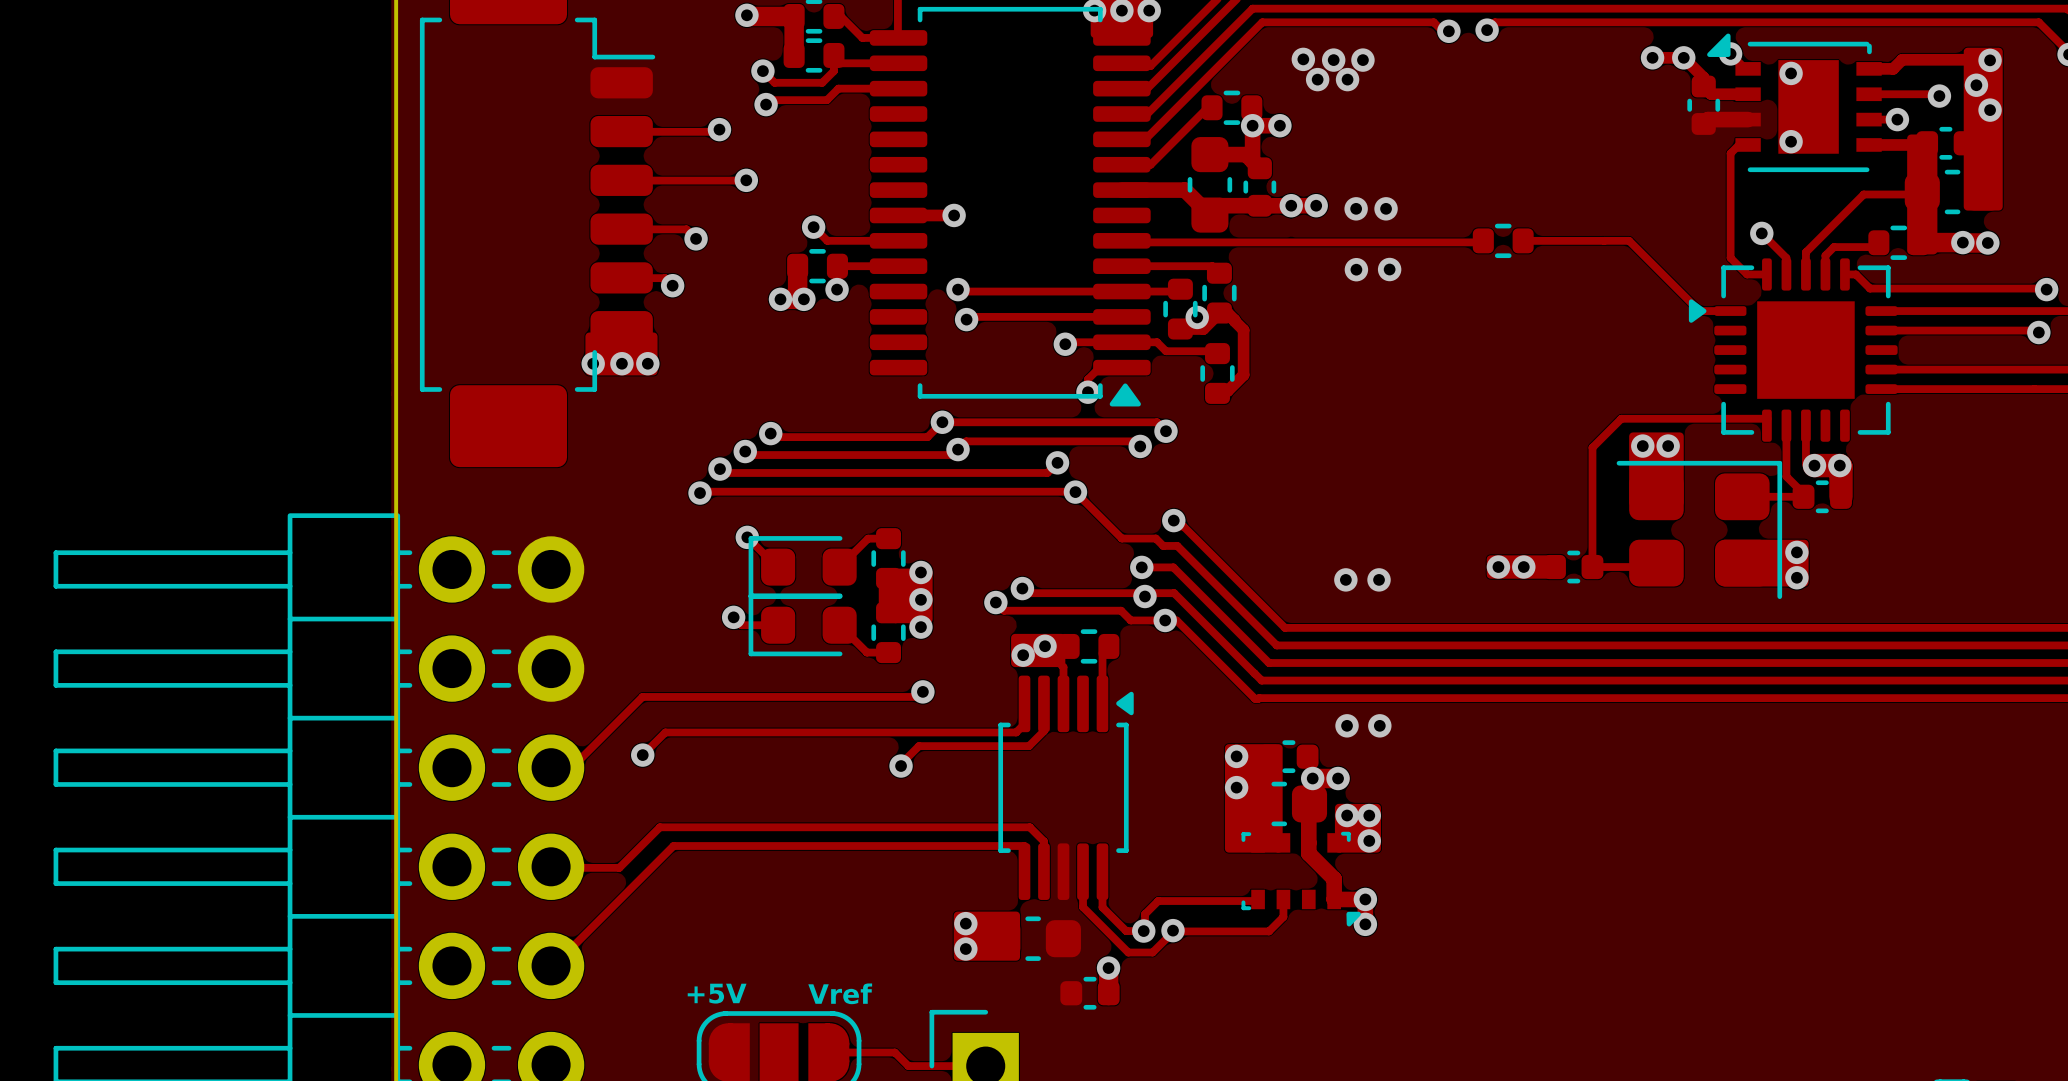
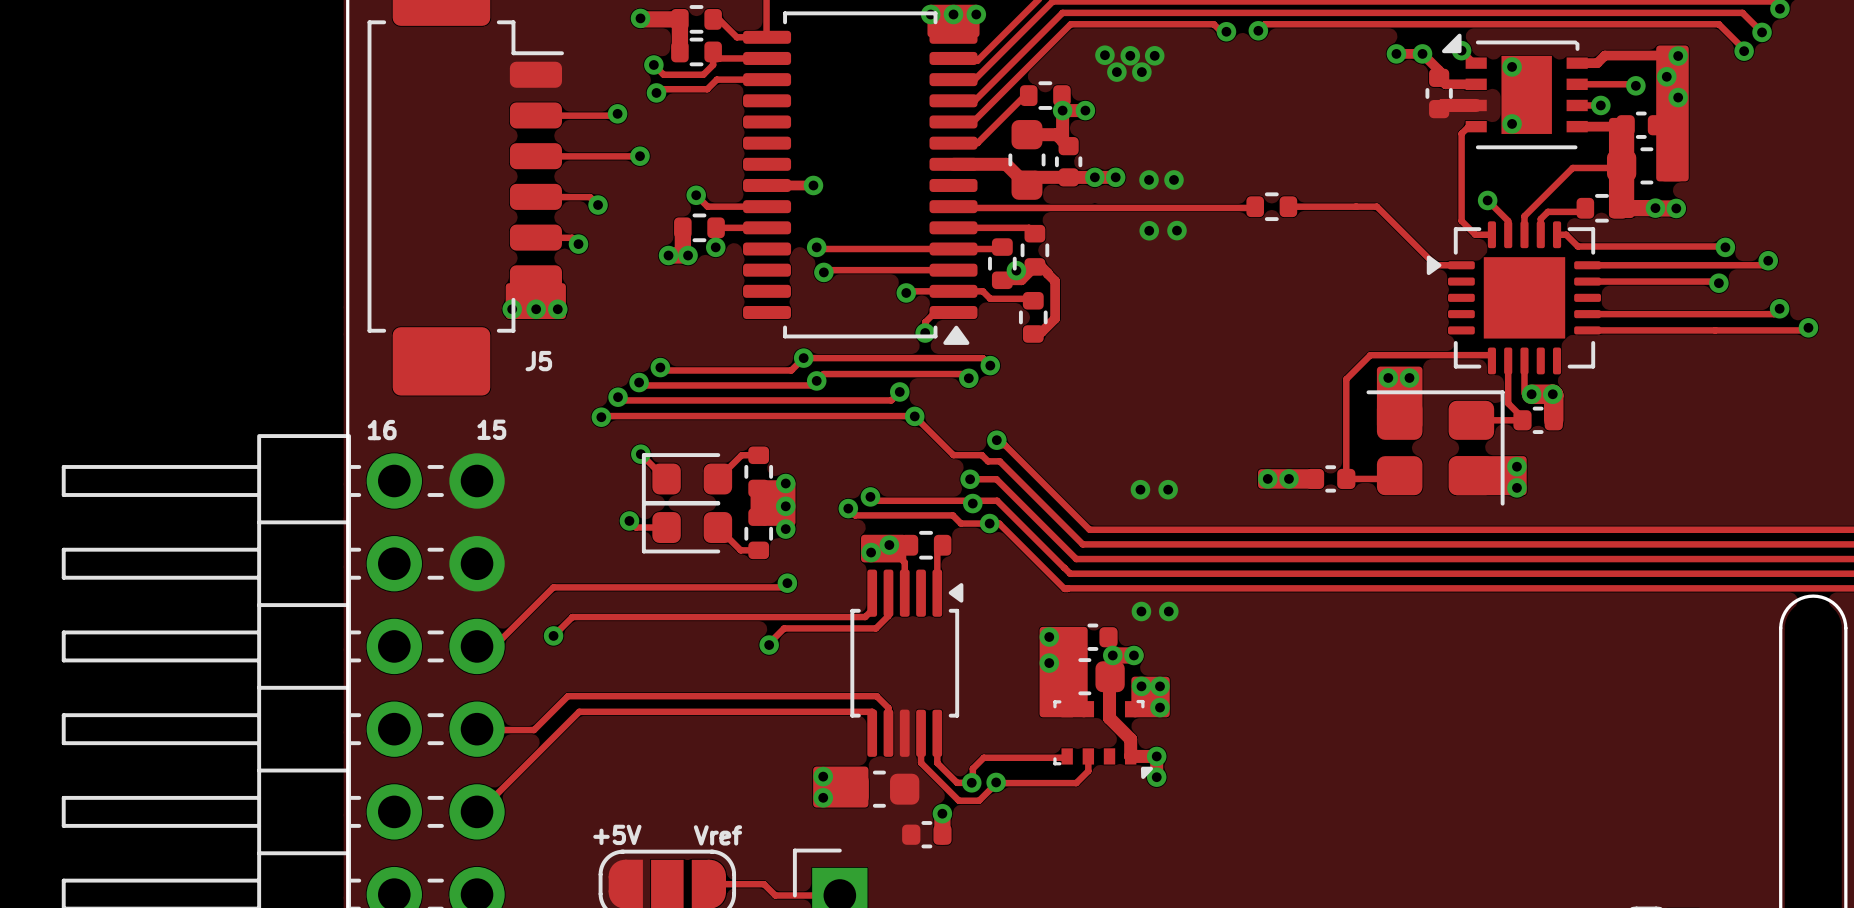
J5 name: none -> J5 (538, 361)
text: none -> 16 (382, 430)
text: none -> 15 (491, 429)

